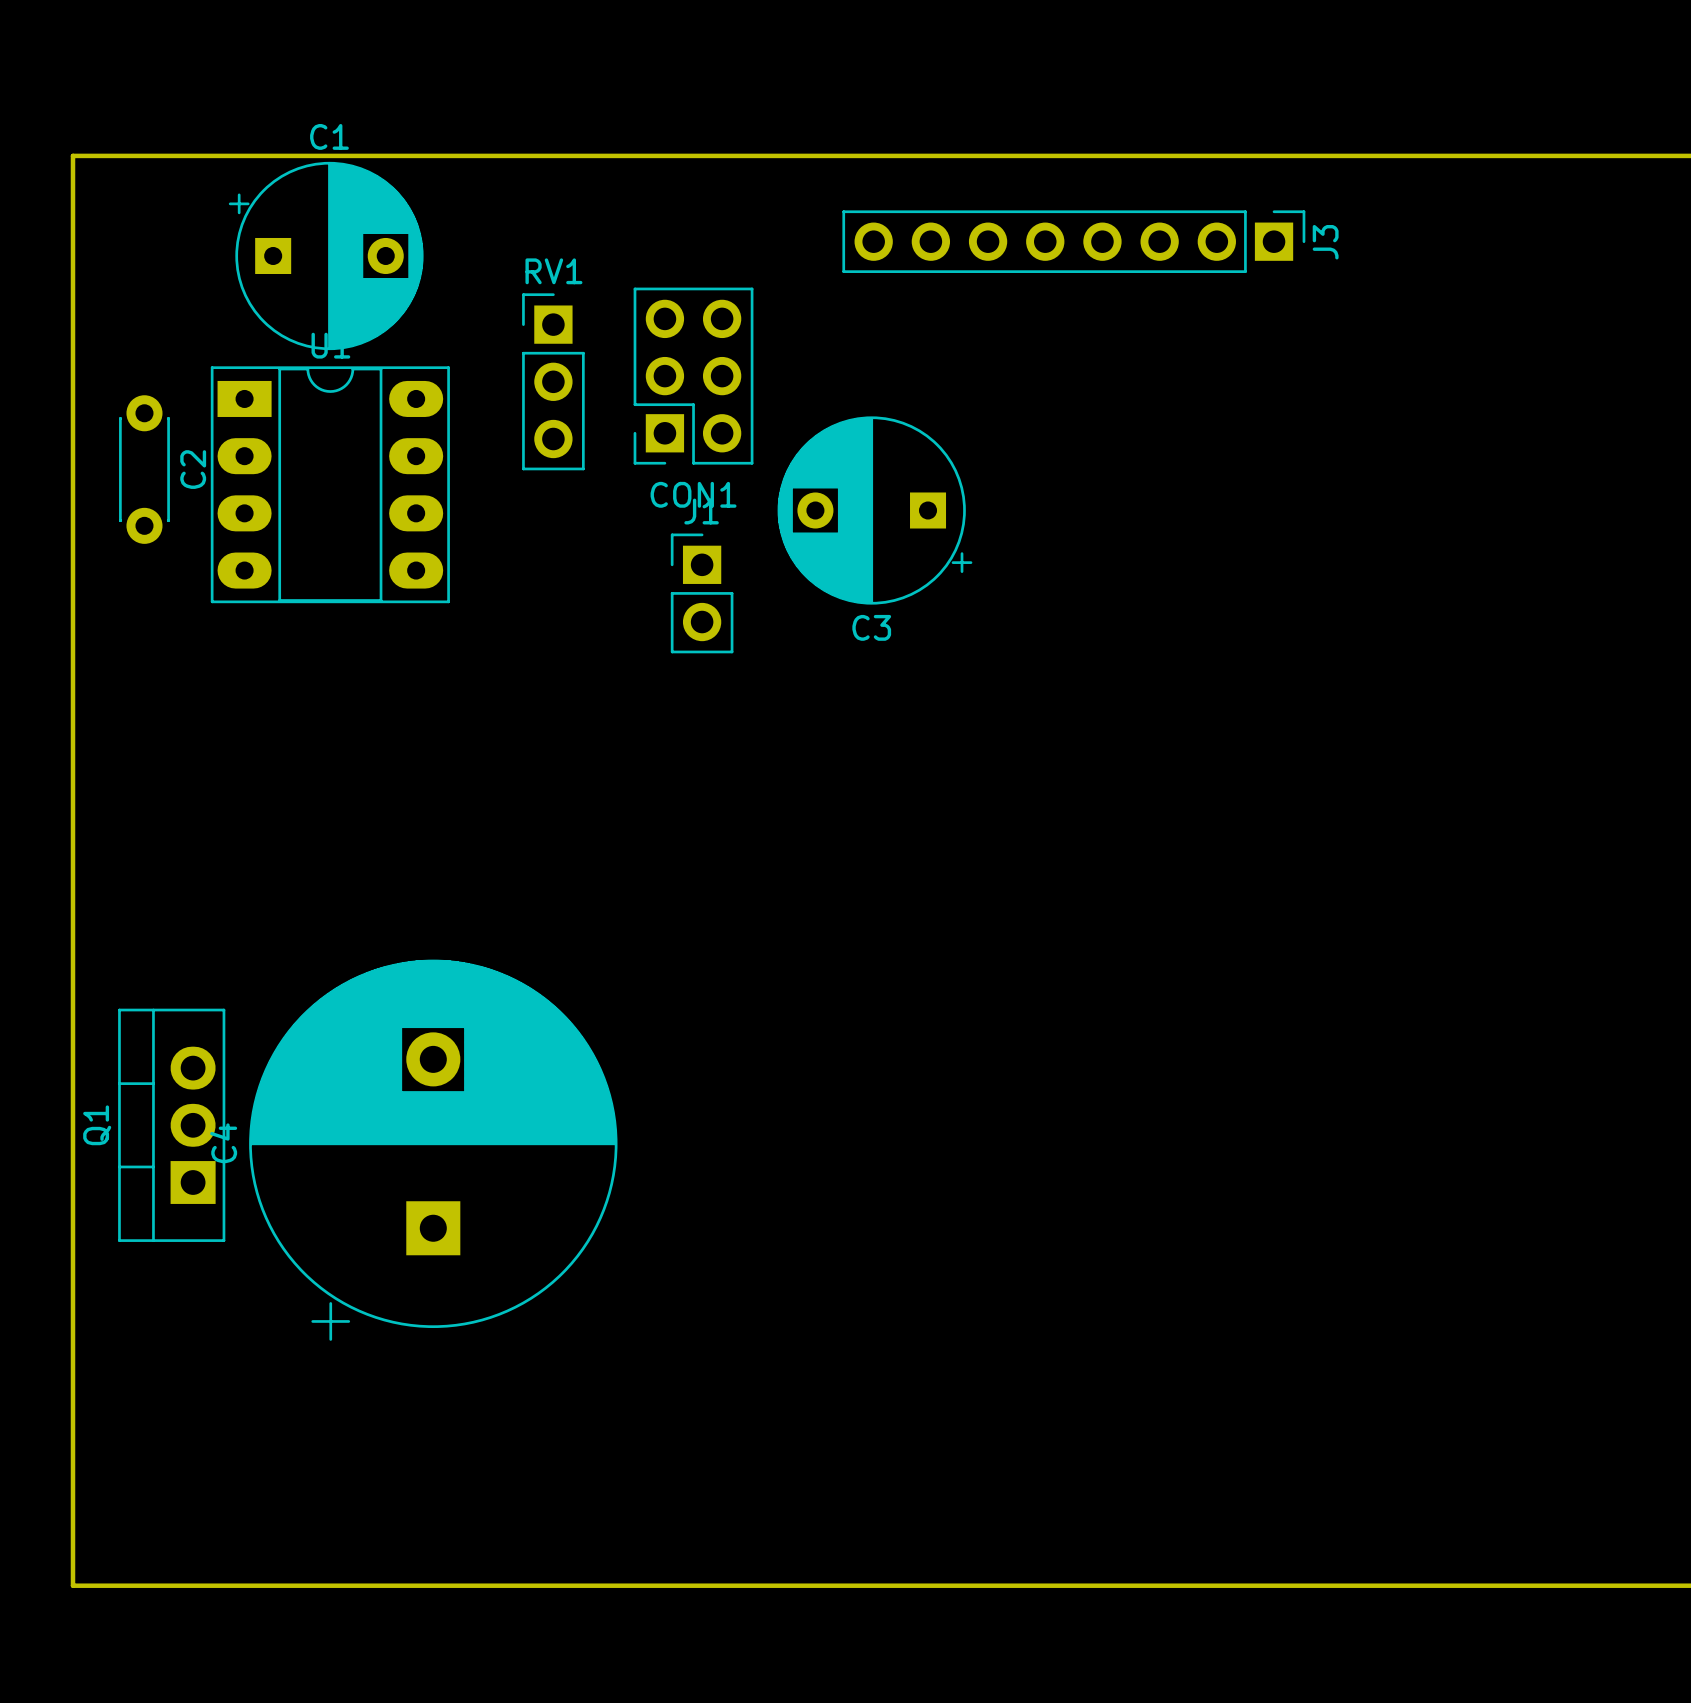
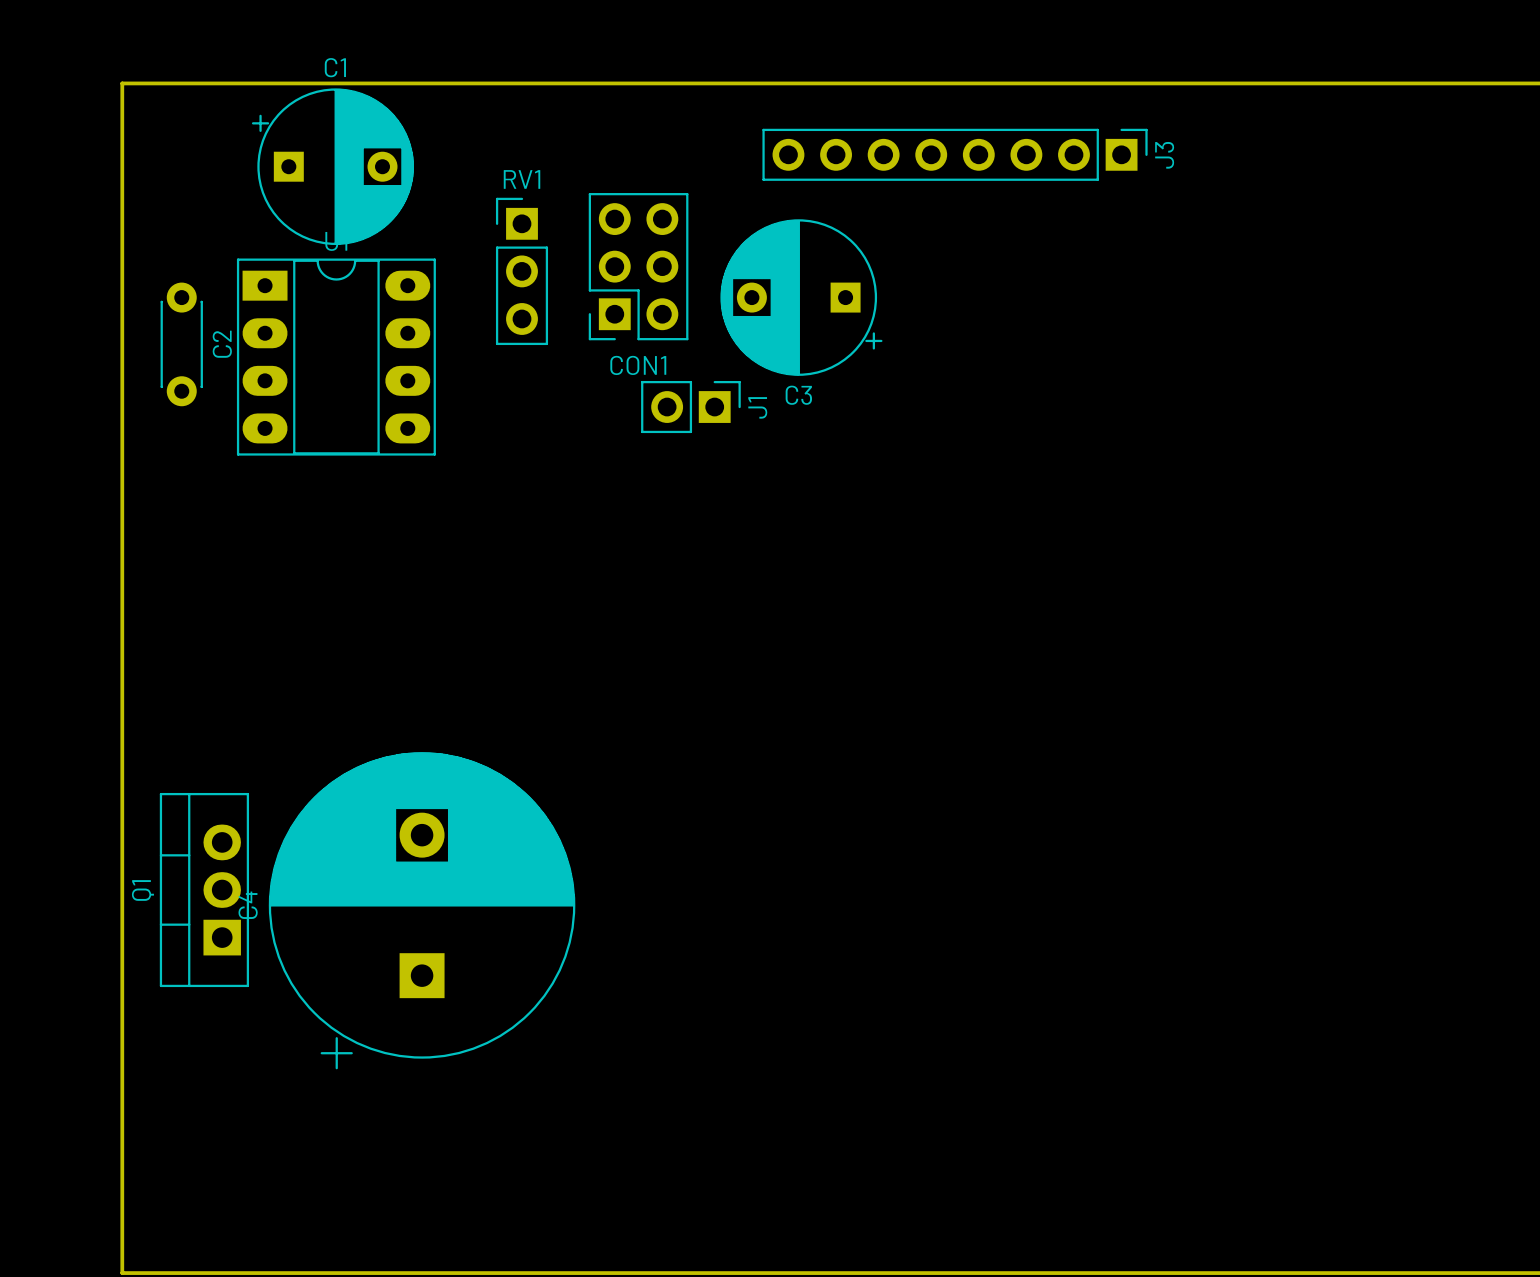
C3 position: (874, 510) -> (801, 297)
J1 rotation: 0° (702, 593) -> 90° clockwise (690, 407)
J1 position: (702, 593) -> (690, 407)

